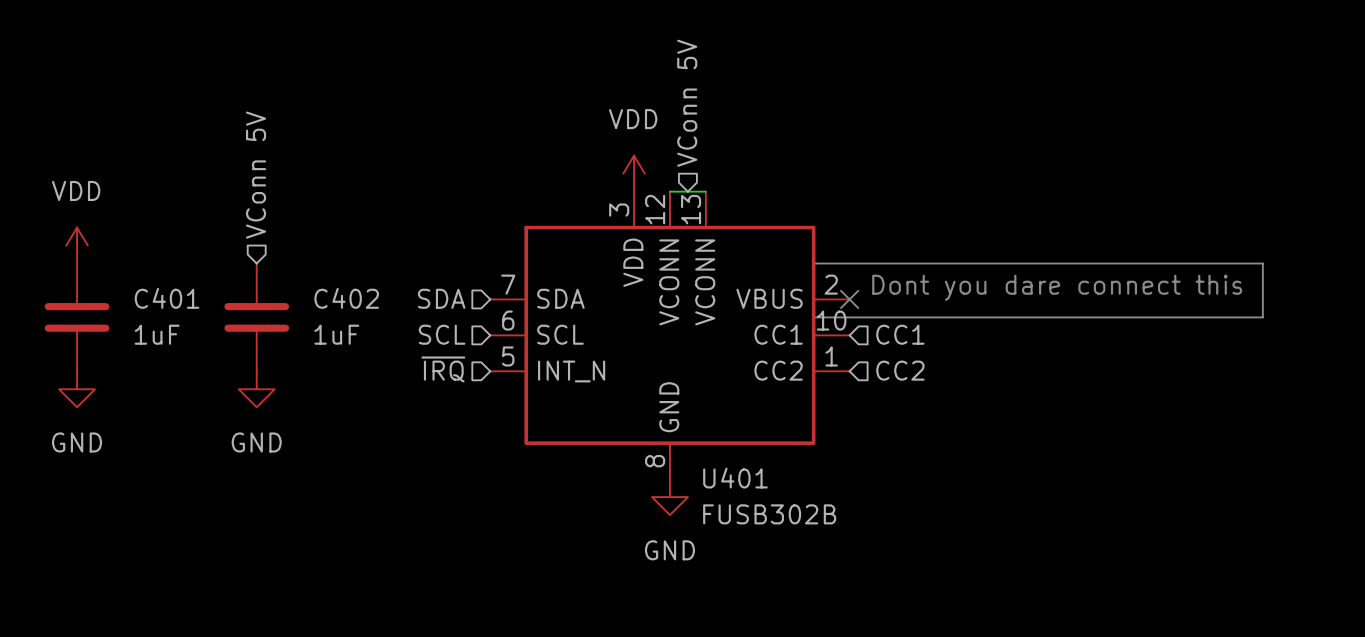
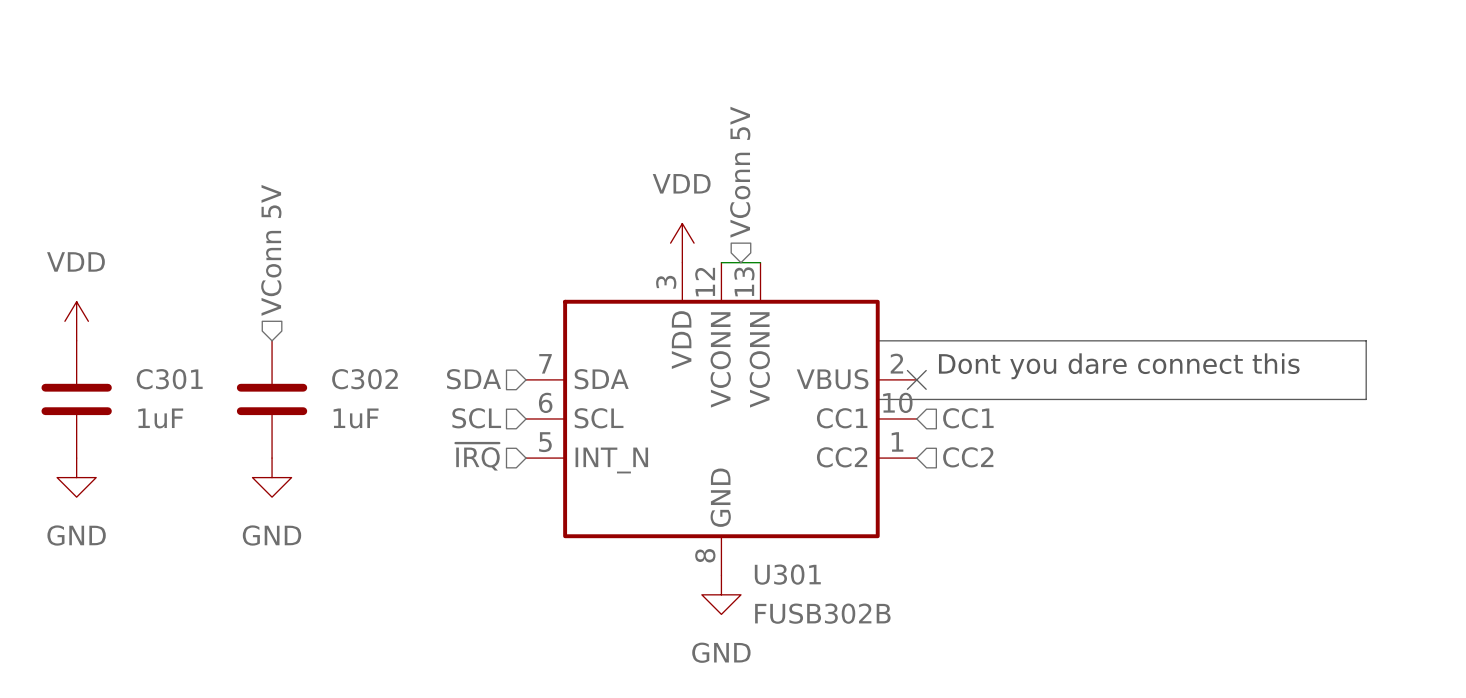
C401 name: C401 (167, 298) -> C301 (169, 379)
C402 name: C402 (346, 298) -> C302 (364, 379)
U401 name: U401 (735, 478) -> U301 (787, 574)

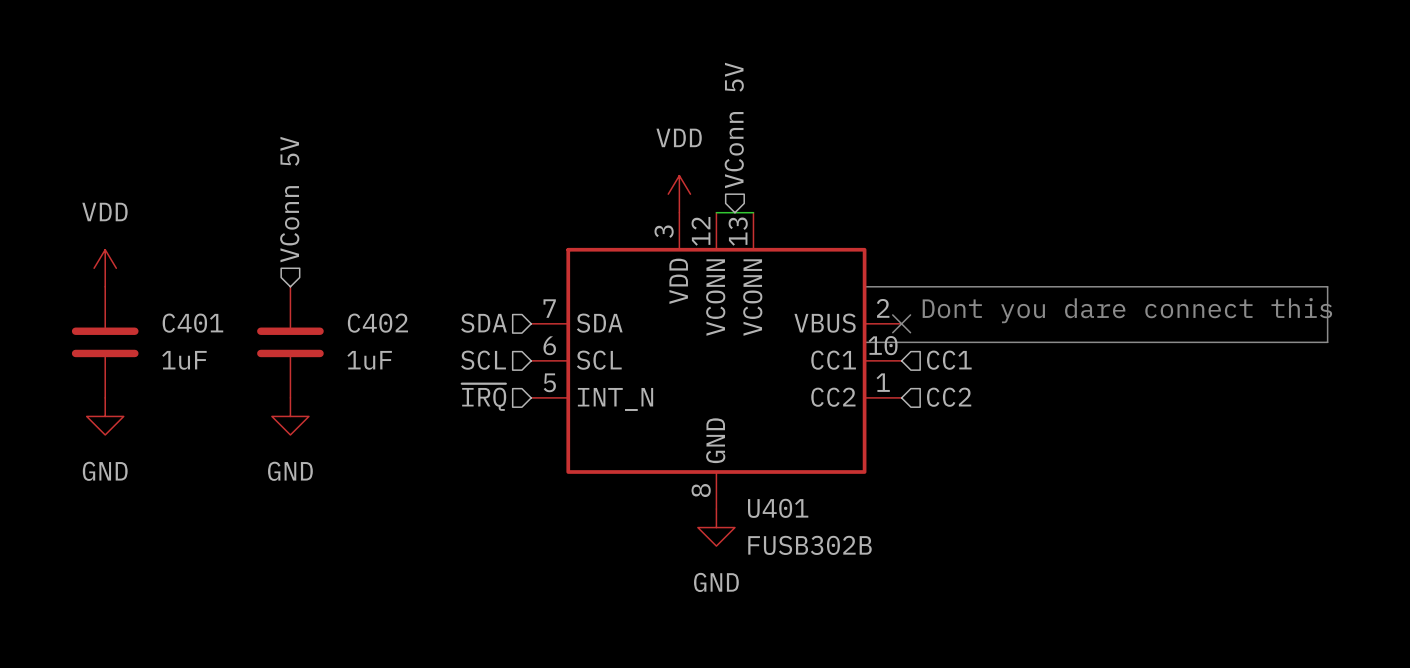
C301 name: C301 (169, 379) -> C401 (192, 323)
C302 name: C302 (364, 379) -> C402 (377, 323)
U301 name: U301 (787, 574) -> U401 (778, 508)

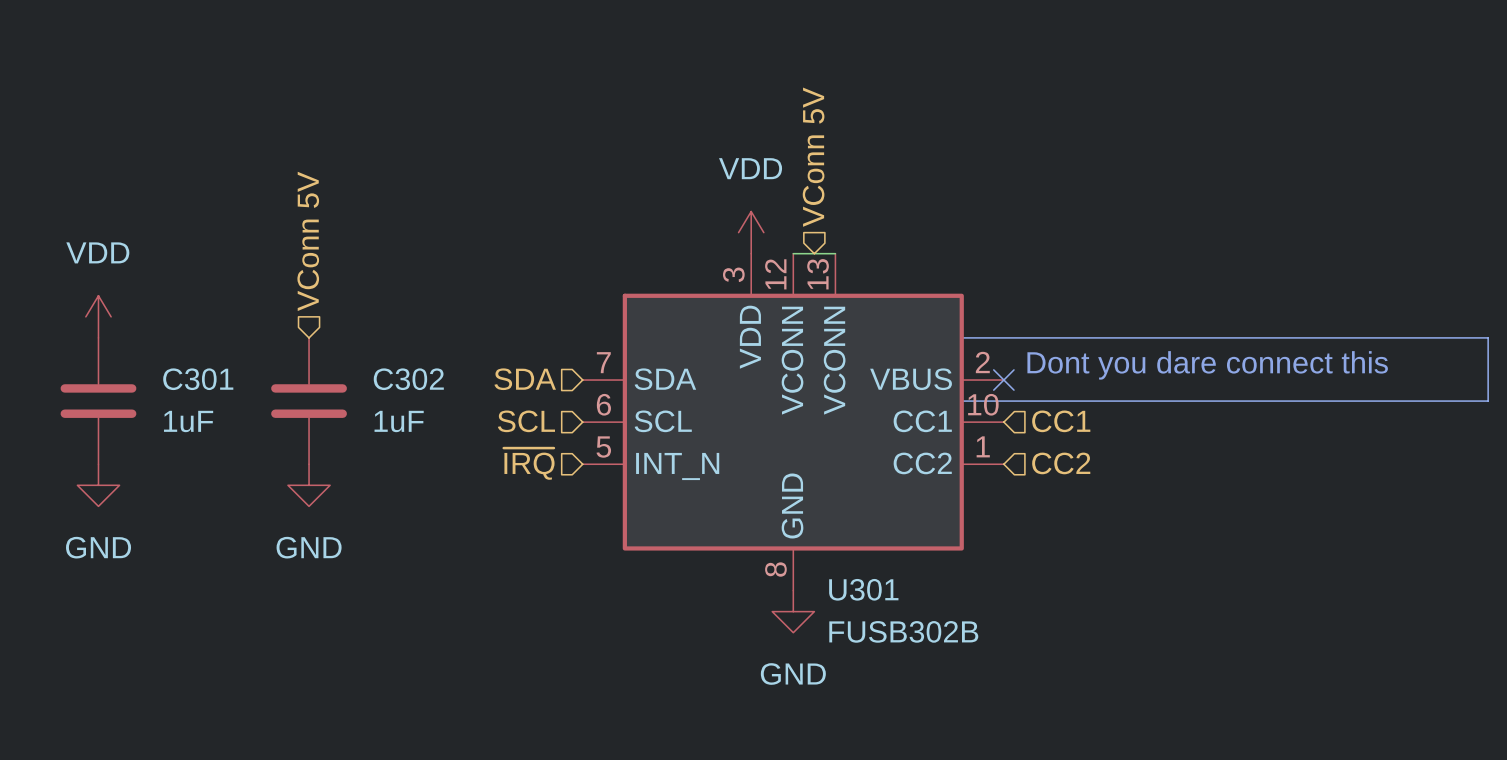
C401 name: C401 (192, 323) -> C301 (198, 379)
C402 name: C402 (377, 323) -> C302 (408, 379)
U401 name: U401 (778, 508) -> U301 (863, 589)

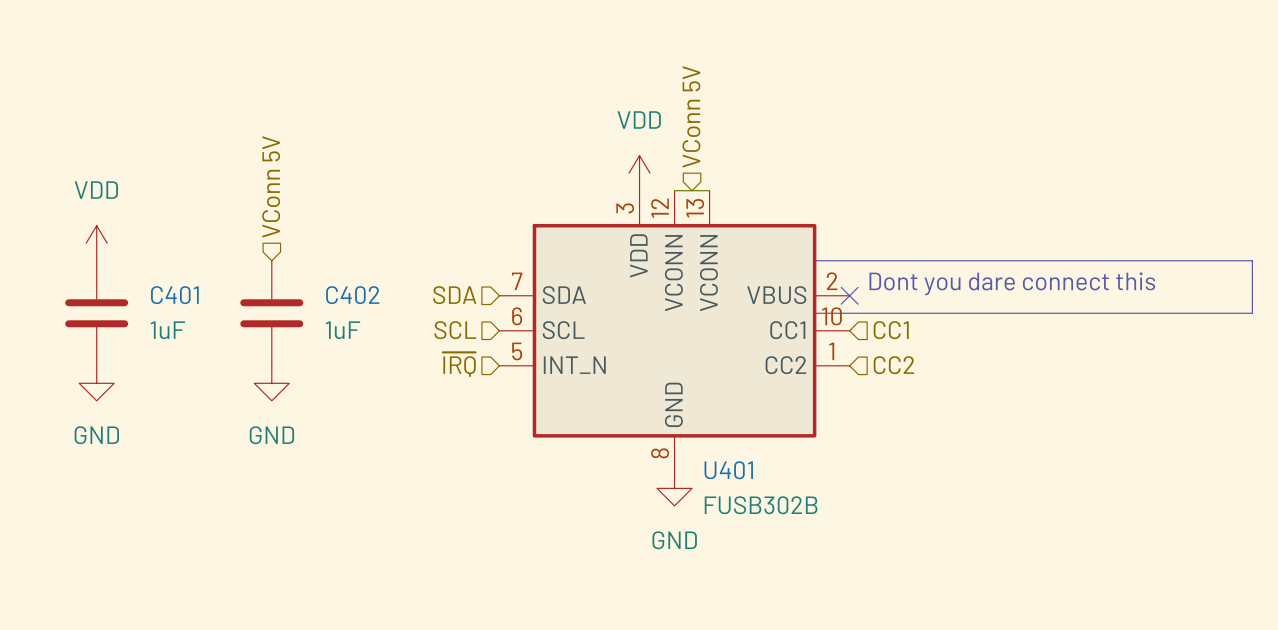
C301 name: C301 (198, 379) -> C401 (174, 295)
C302 name: C302 (408, 379) -> C402 (352, 295)
U301 name: U301 (863, 589) -> U401 (728, 470)

